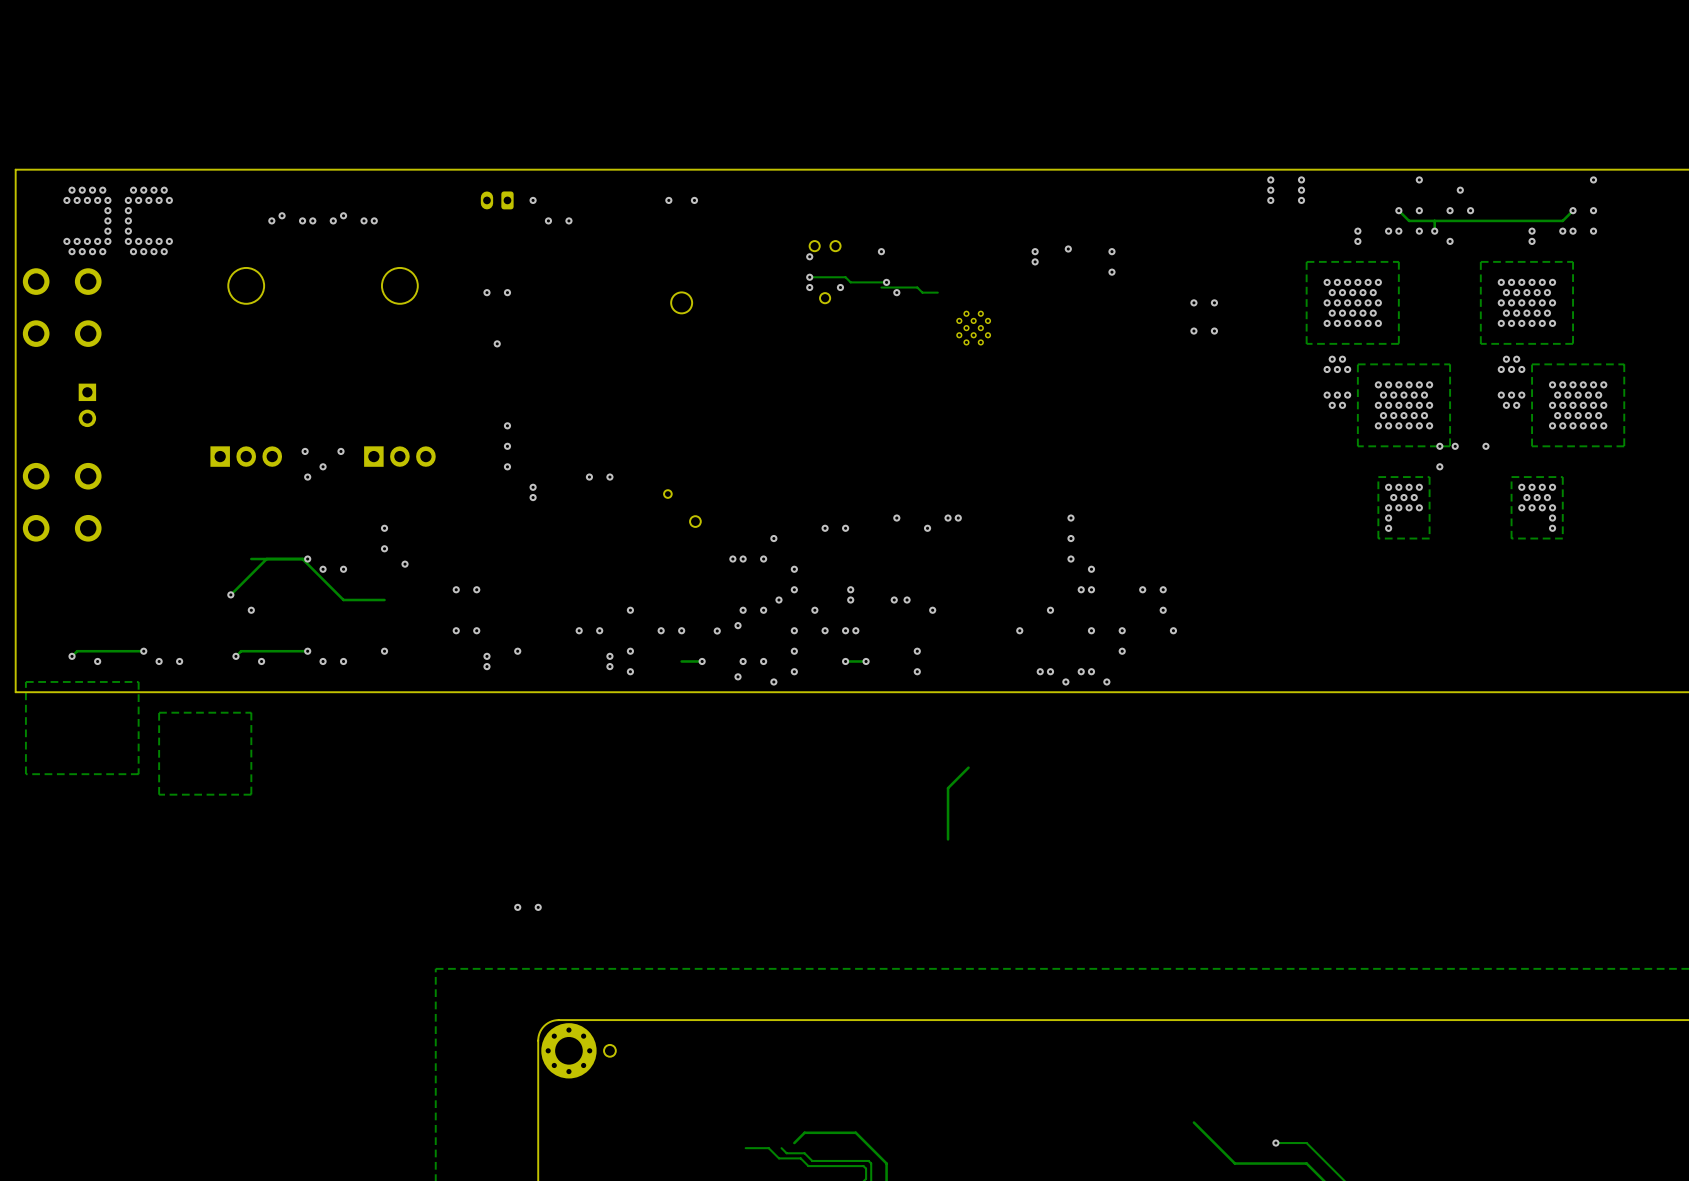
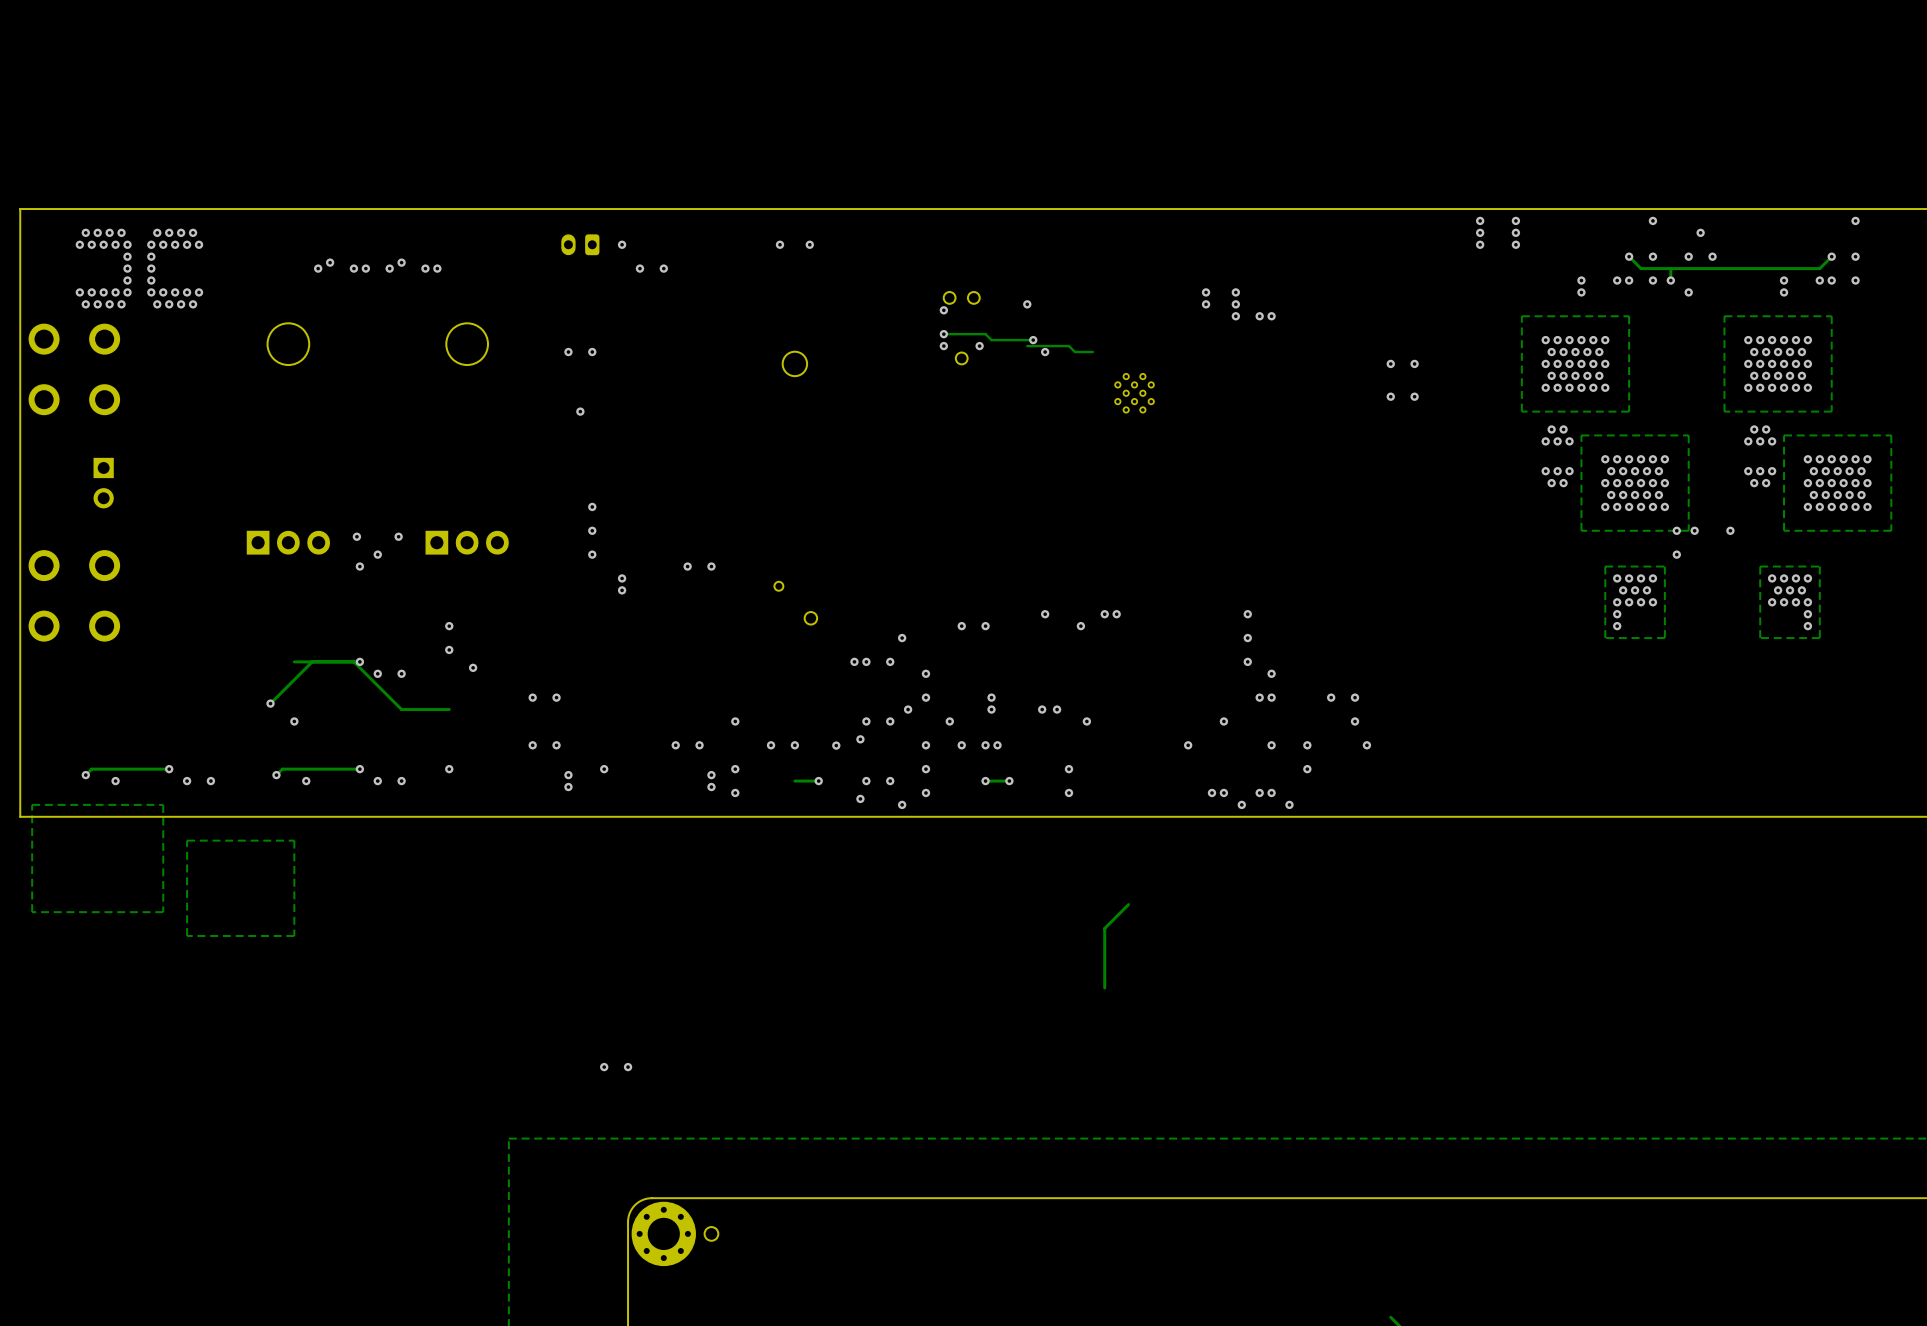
via: none -> (1206, 292)
via: none -> (1235, 292)
via: (1068, 248) -> none
via: none -> (1235, 304)
via: (1111, 251) -> none
via: (1035, 261) -> none
via: none -> (1235, 316)
via: none -> (1259, 316)
via: none -> (1271, 316)
via: (1111, 272) -> none

